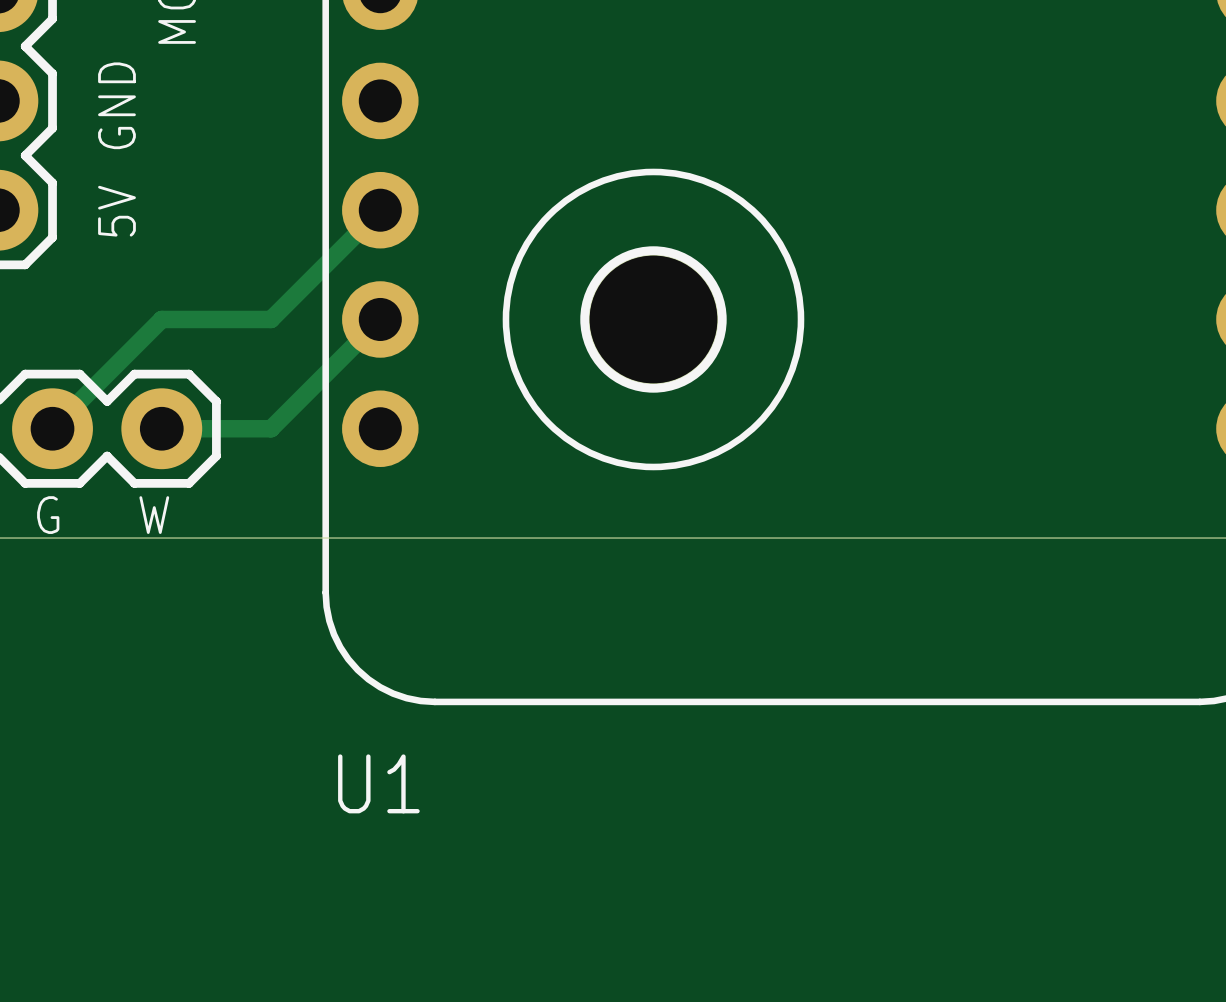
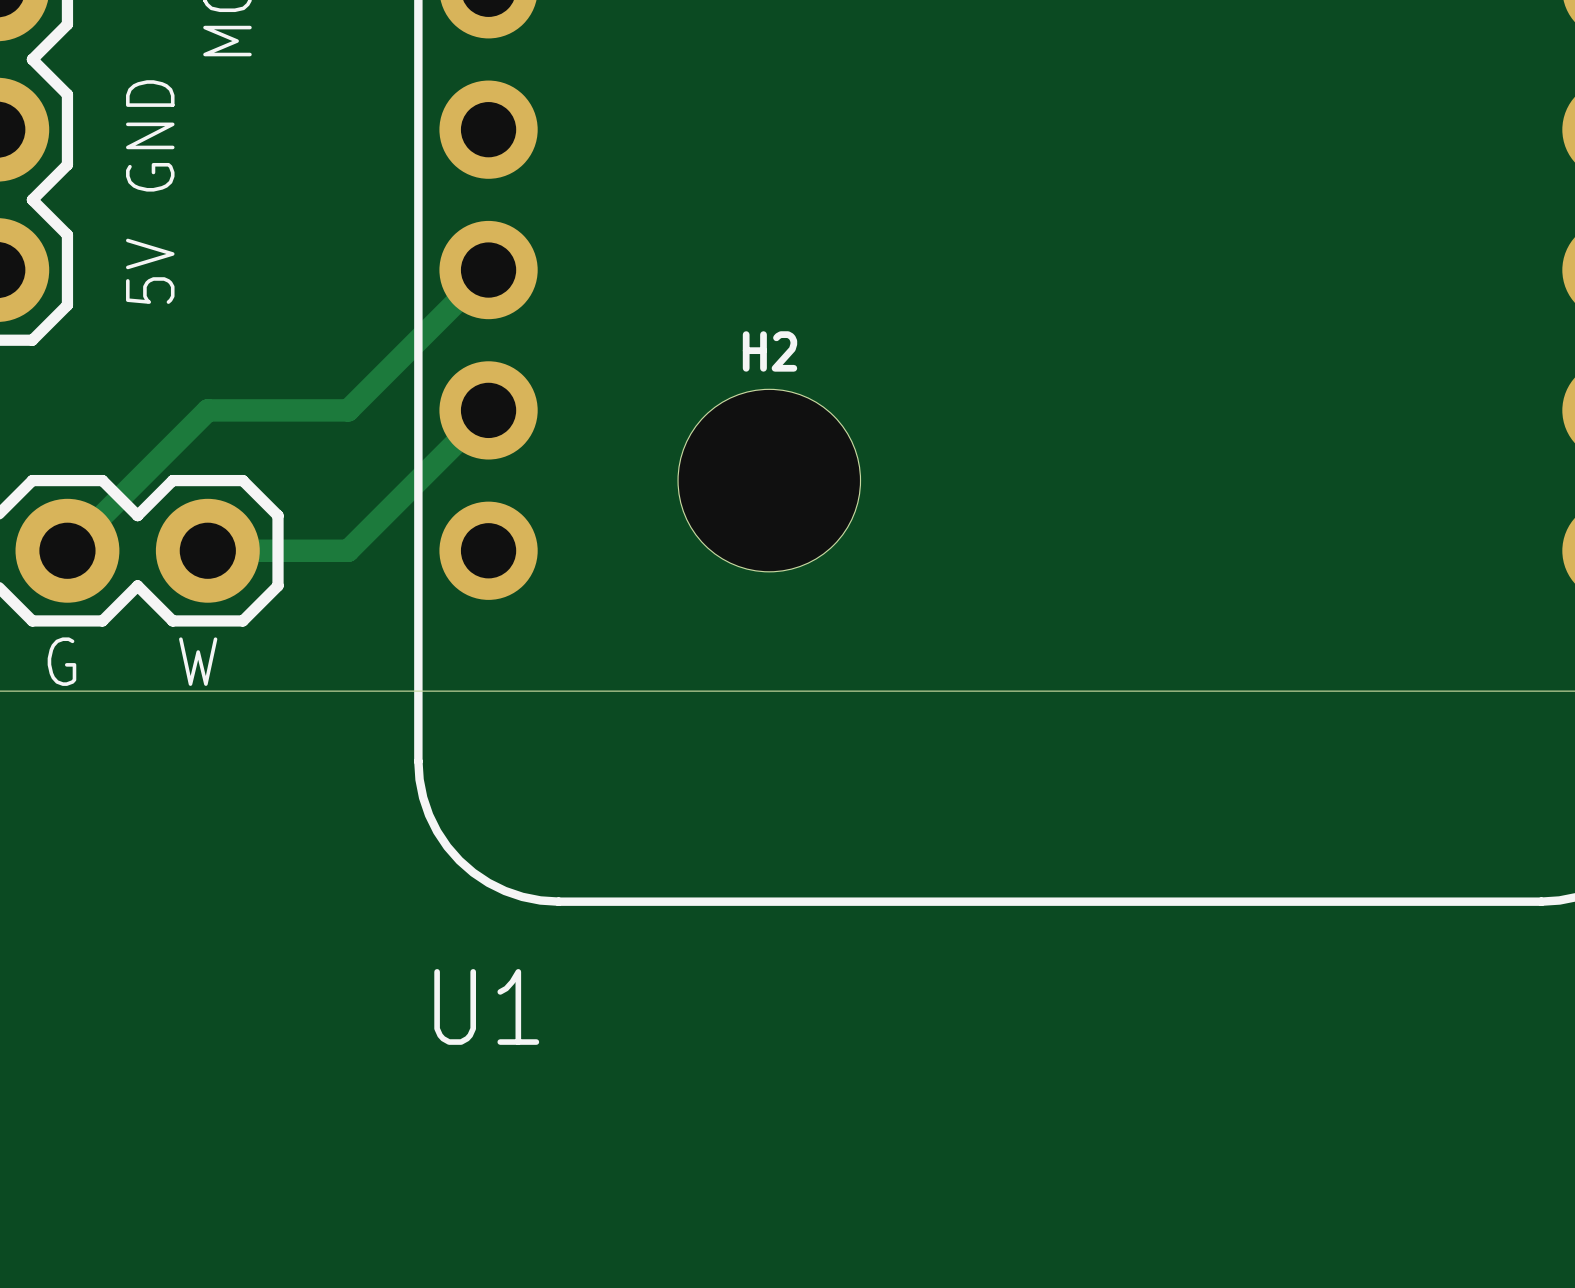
part: (653, 319) -> none
H2: none -> (769, 480)

